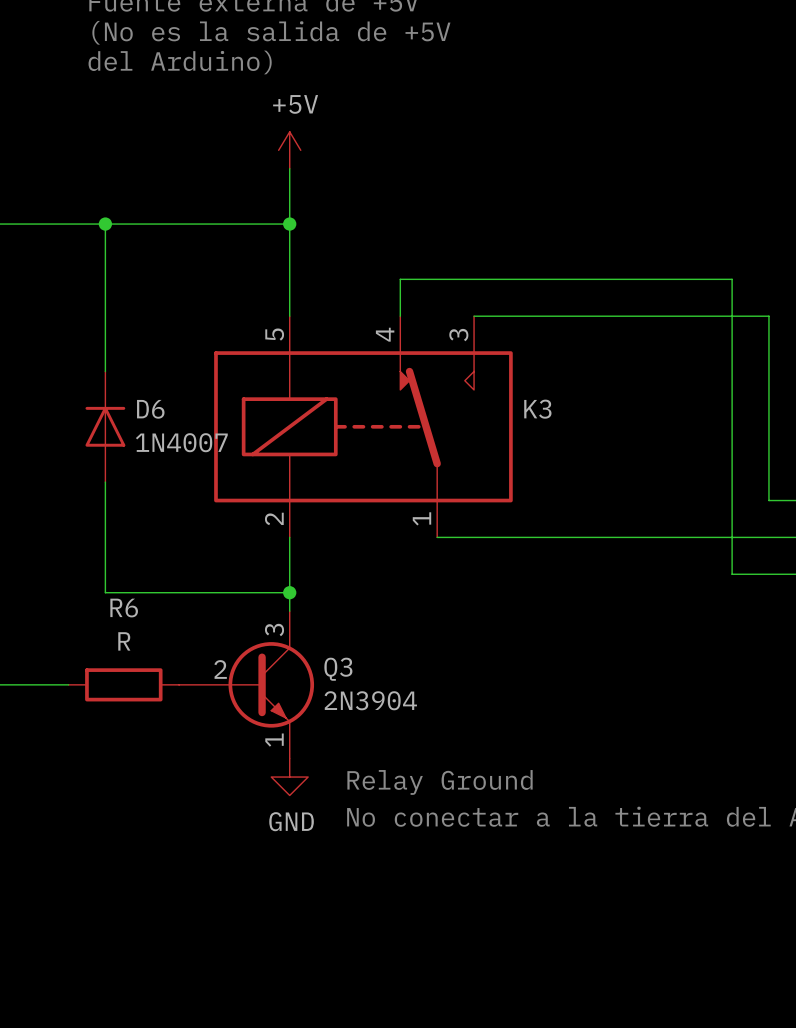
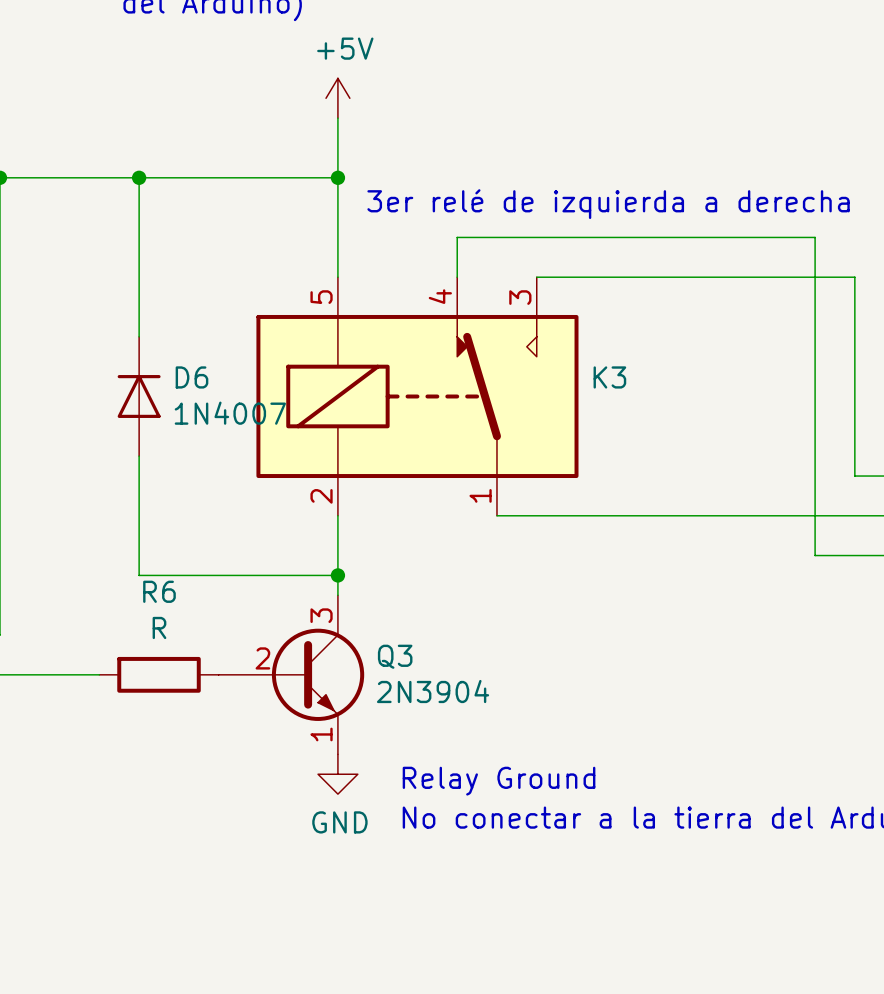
text: none -> 3er relé de izquierda a derecha (608, 204)

